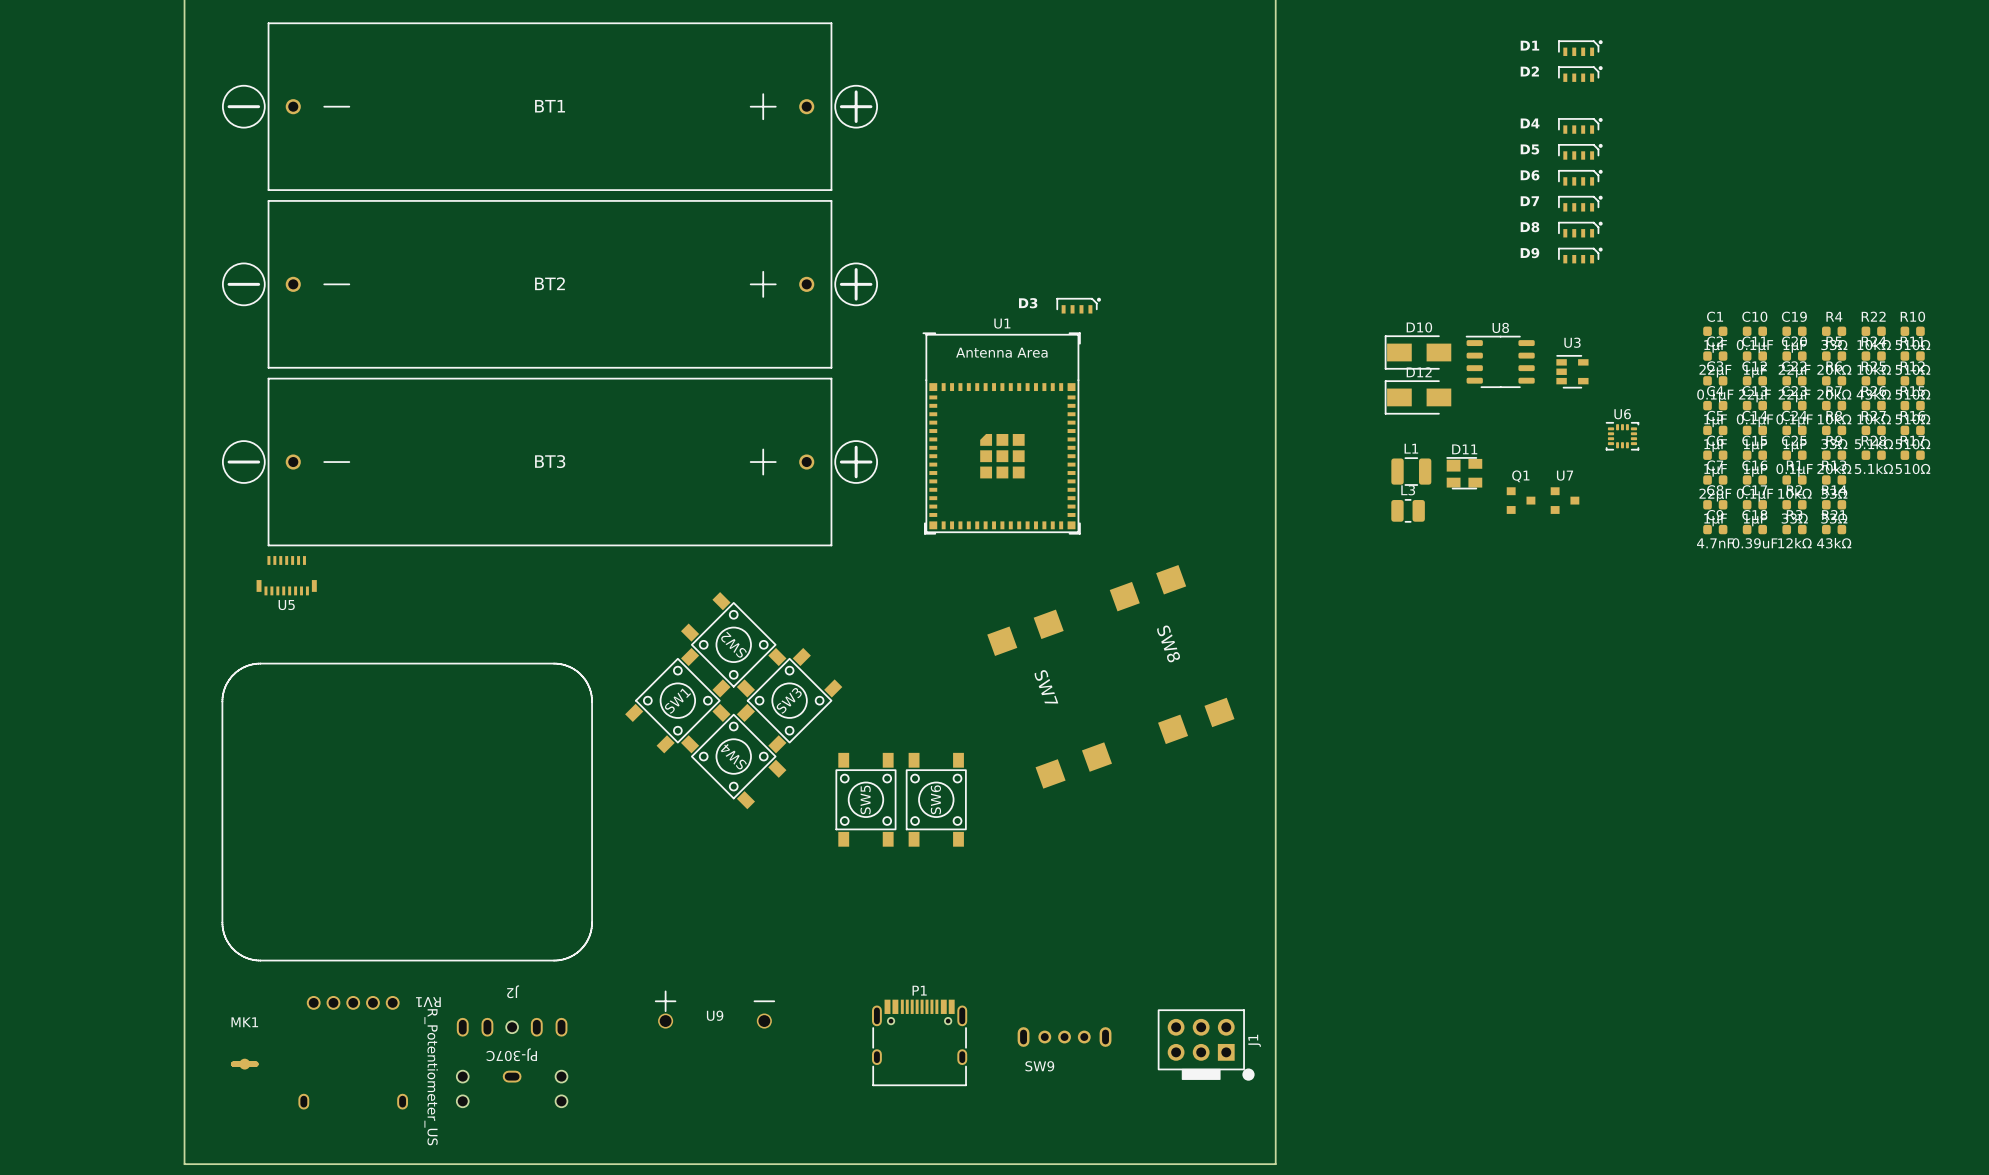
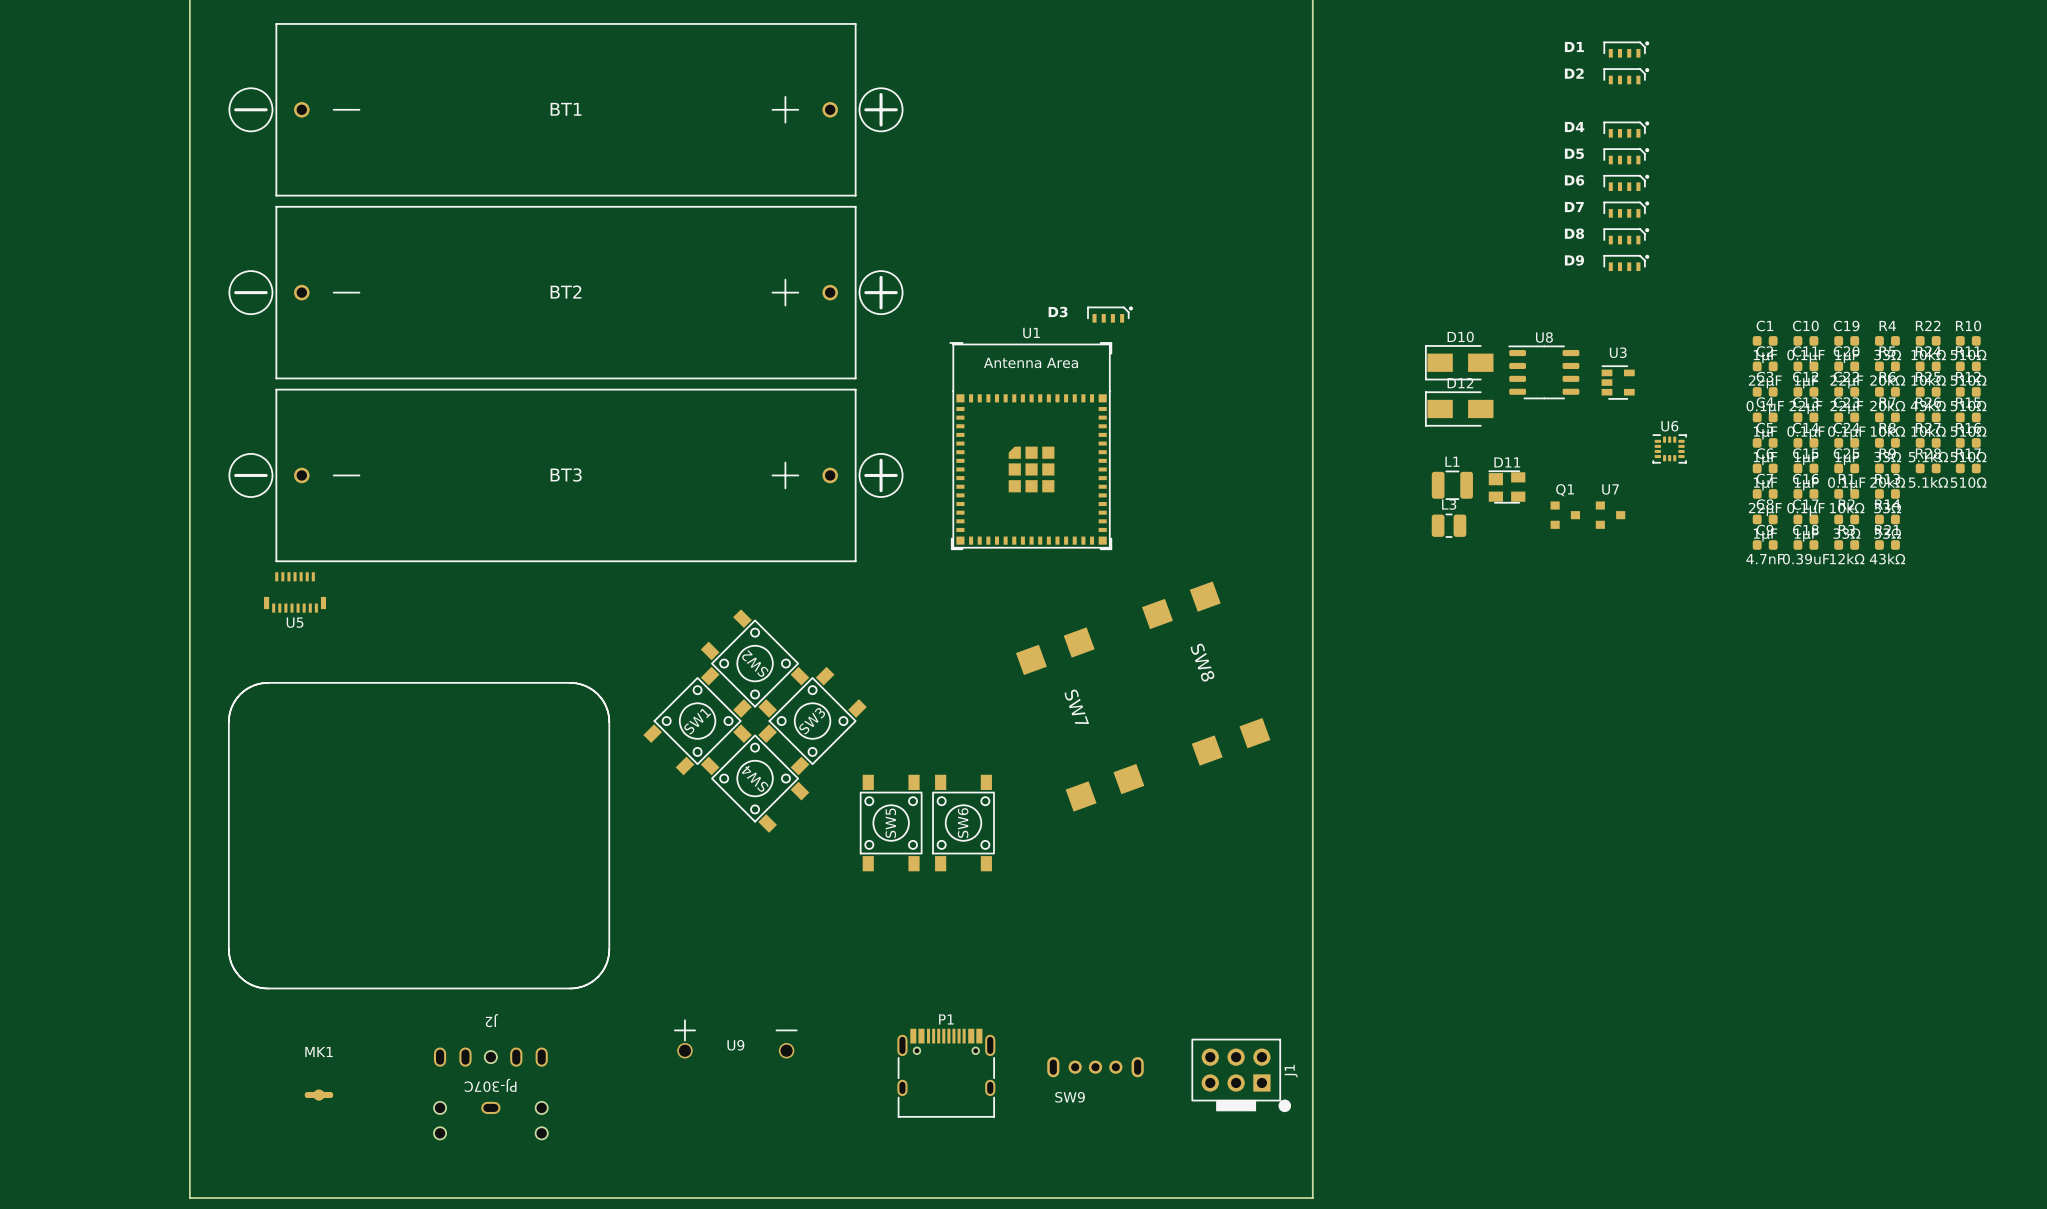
RV1: R_Potentiometer_US (353, 1052) -> none
J2 position: (512, 1062) -> (490, 1093)
MK1 position: (244, 1064) -> (318, 1095)

